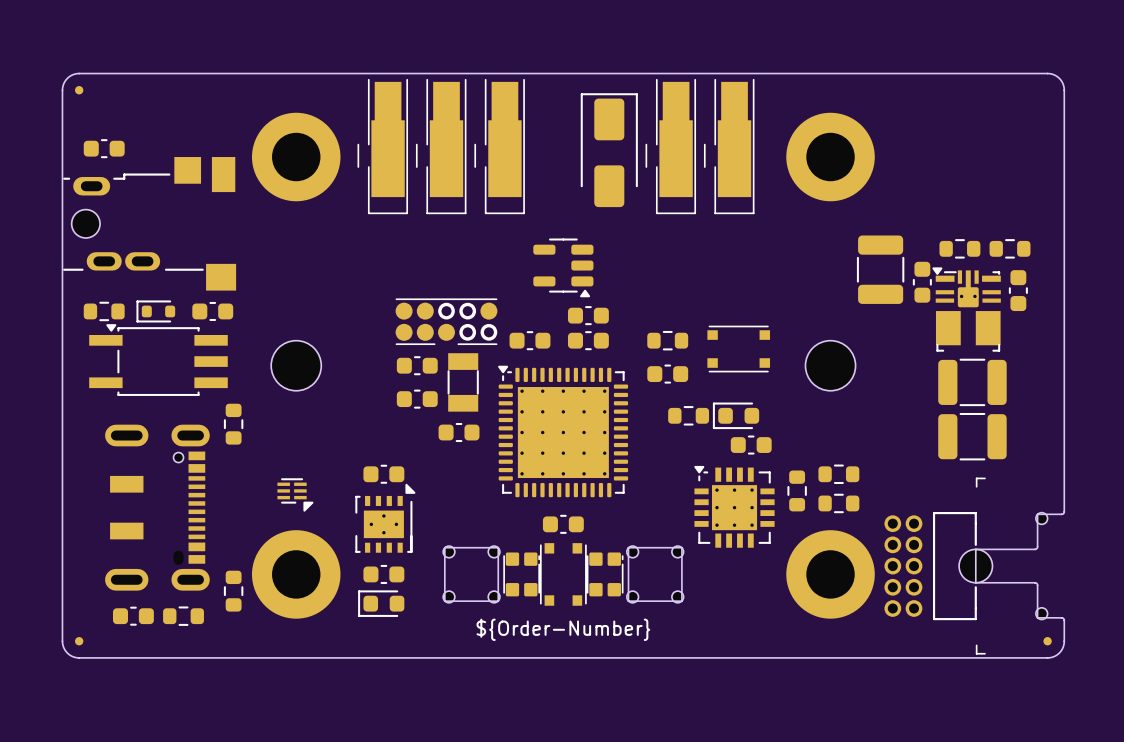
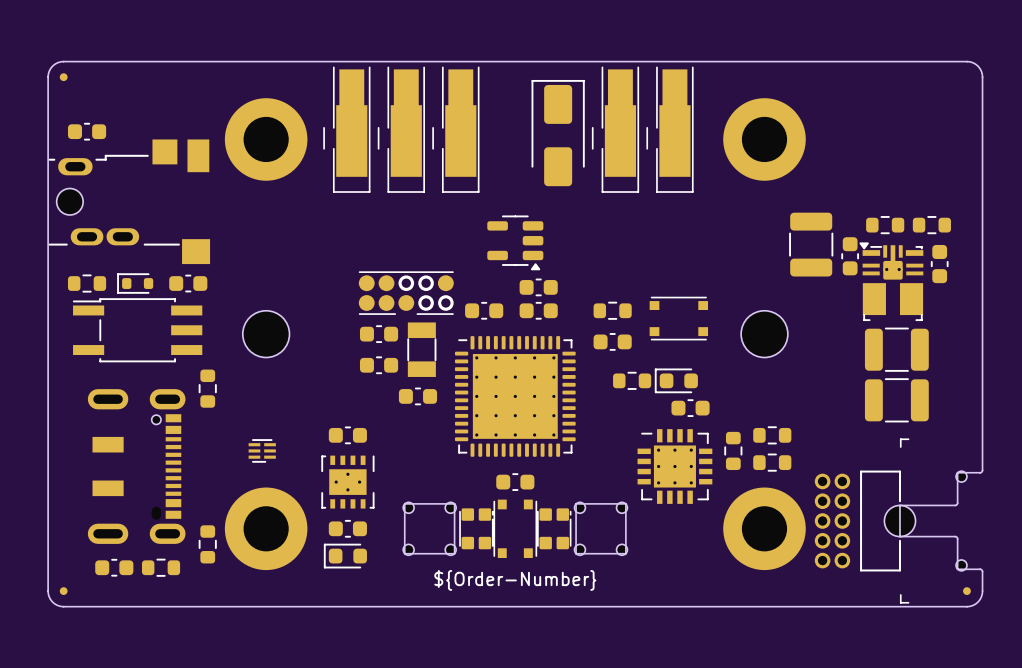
part footprint: [89, 324, 228, 396] -> [72, 298, 203, 363]
part footprint: [498, 365, 629, 498] -> [454, 336, 576, 457]
part footprint: [694, 465, 775, 548] -> [637, 429, 713, 504]
part footprint: [277, 478, 314, 512] -> [248, 439, 276, 463]
part footprint: [355, 483, 416, 553] -> [321, 455, 375, 509]

